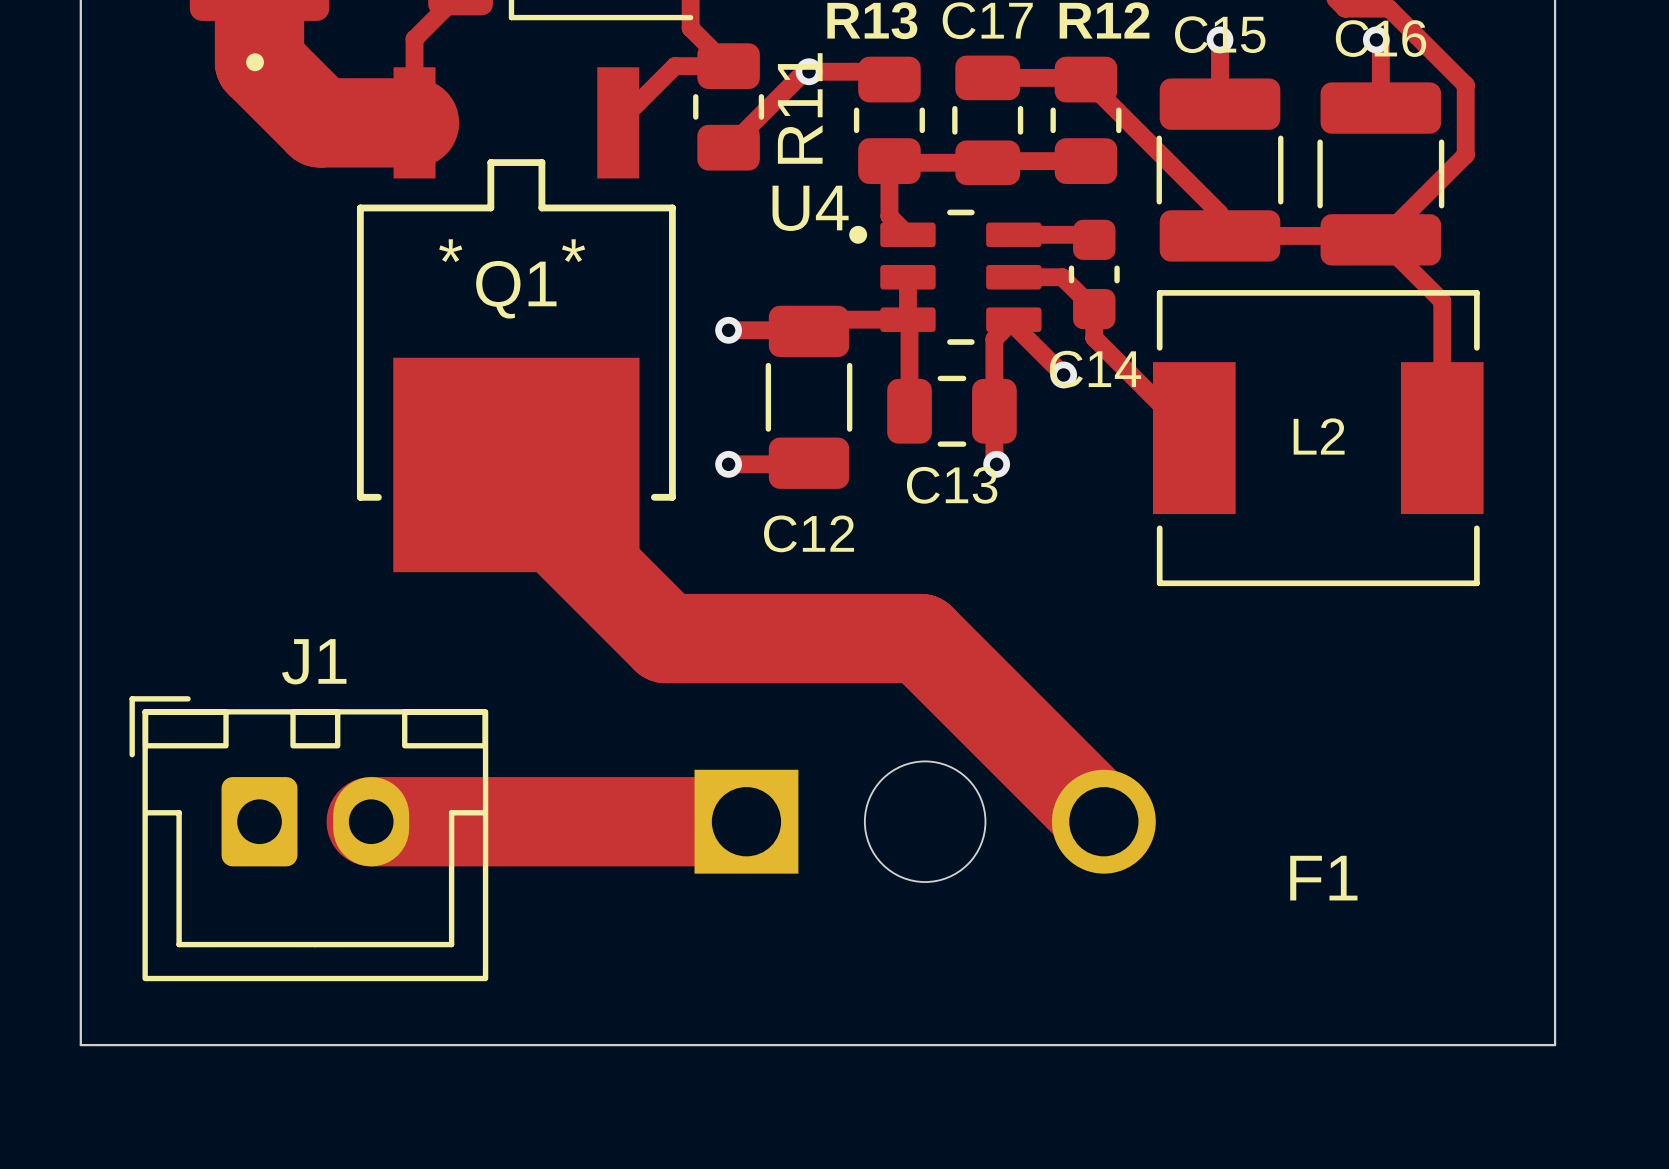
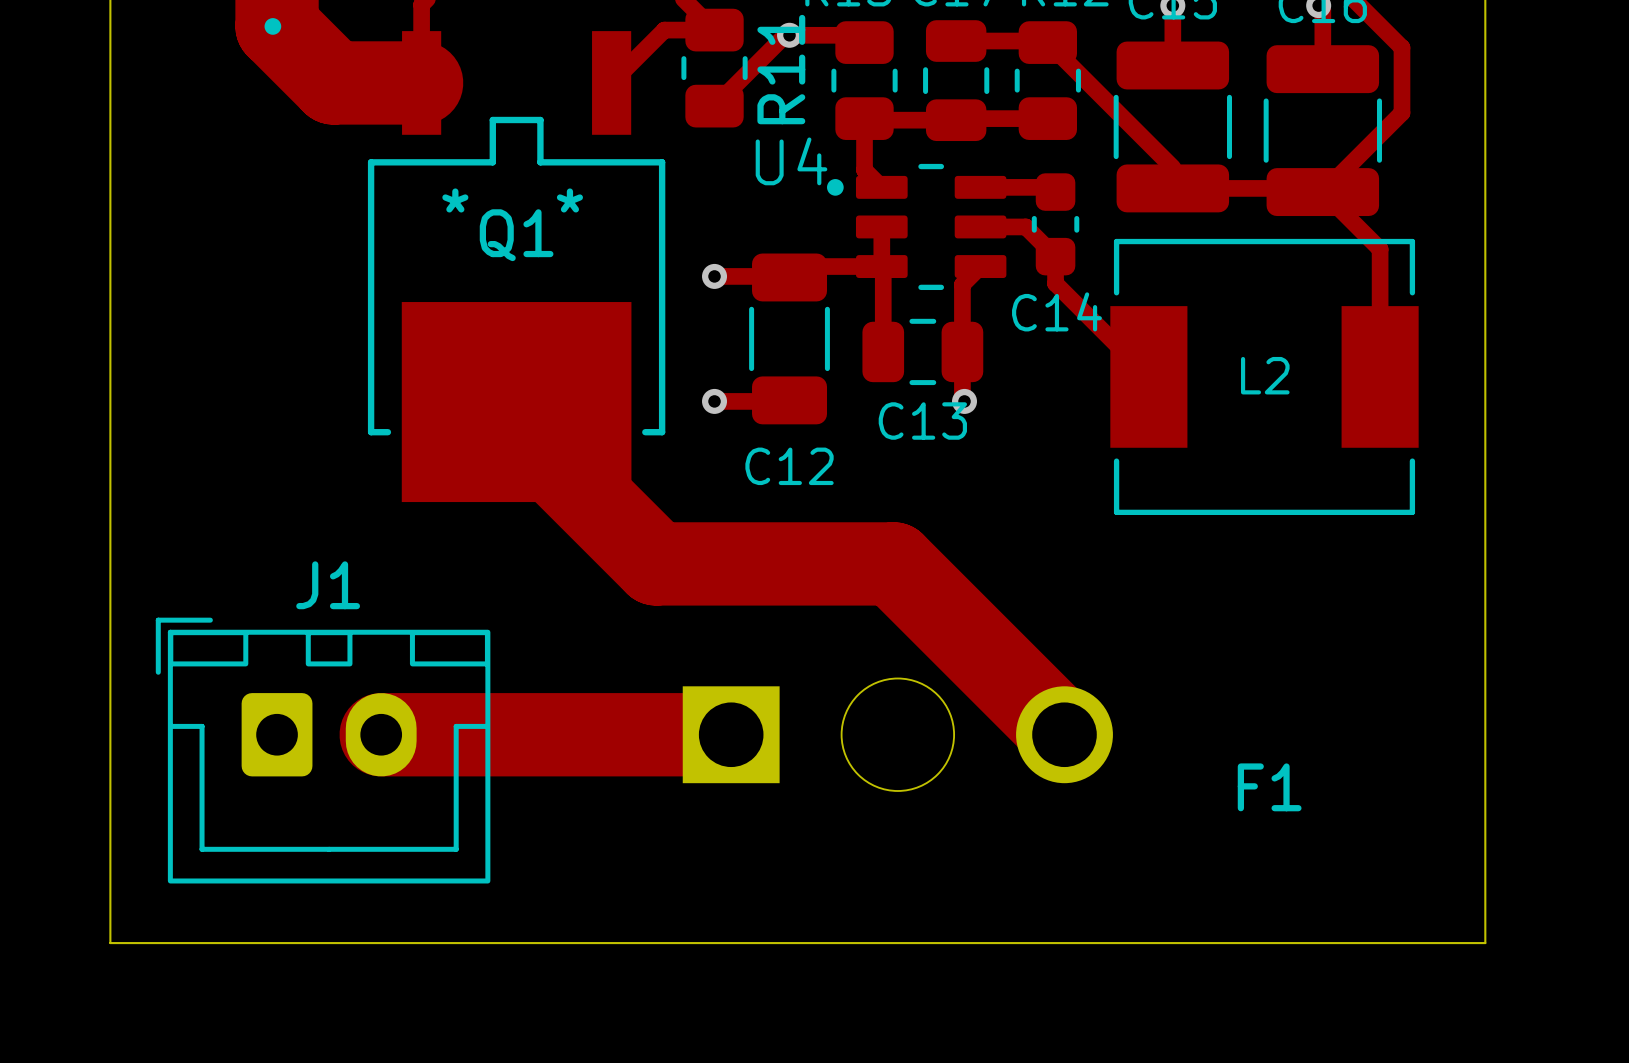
top track: (1013, 319) (1013, 325) (1063, 374) -> none
via: (1063, 374) -> none

